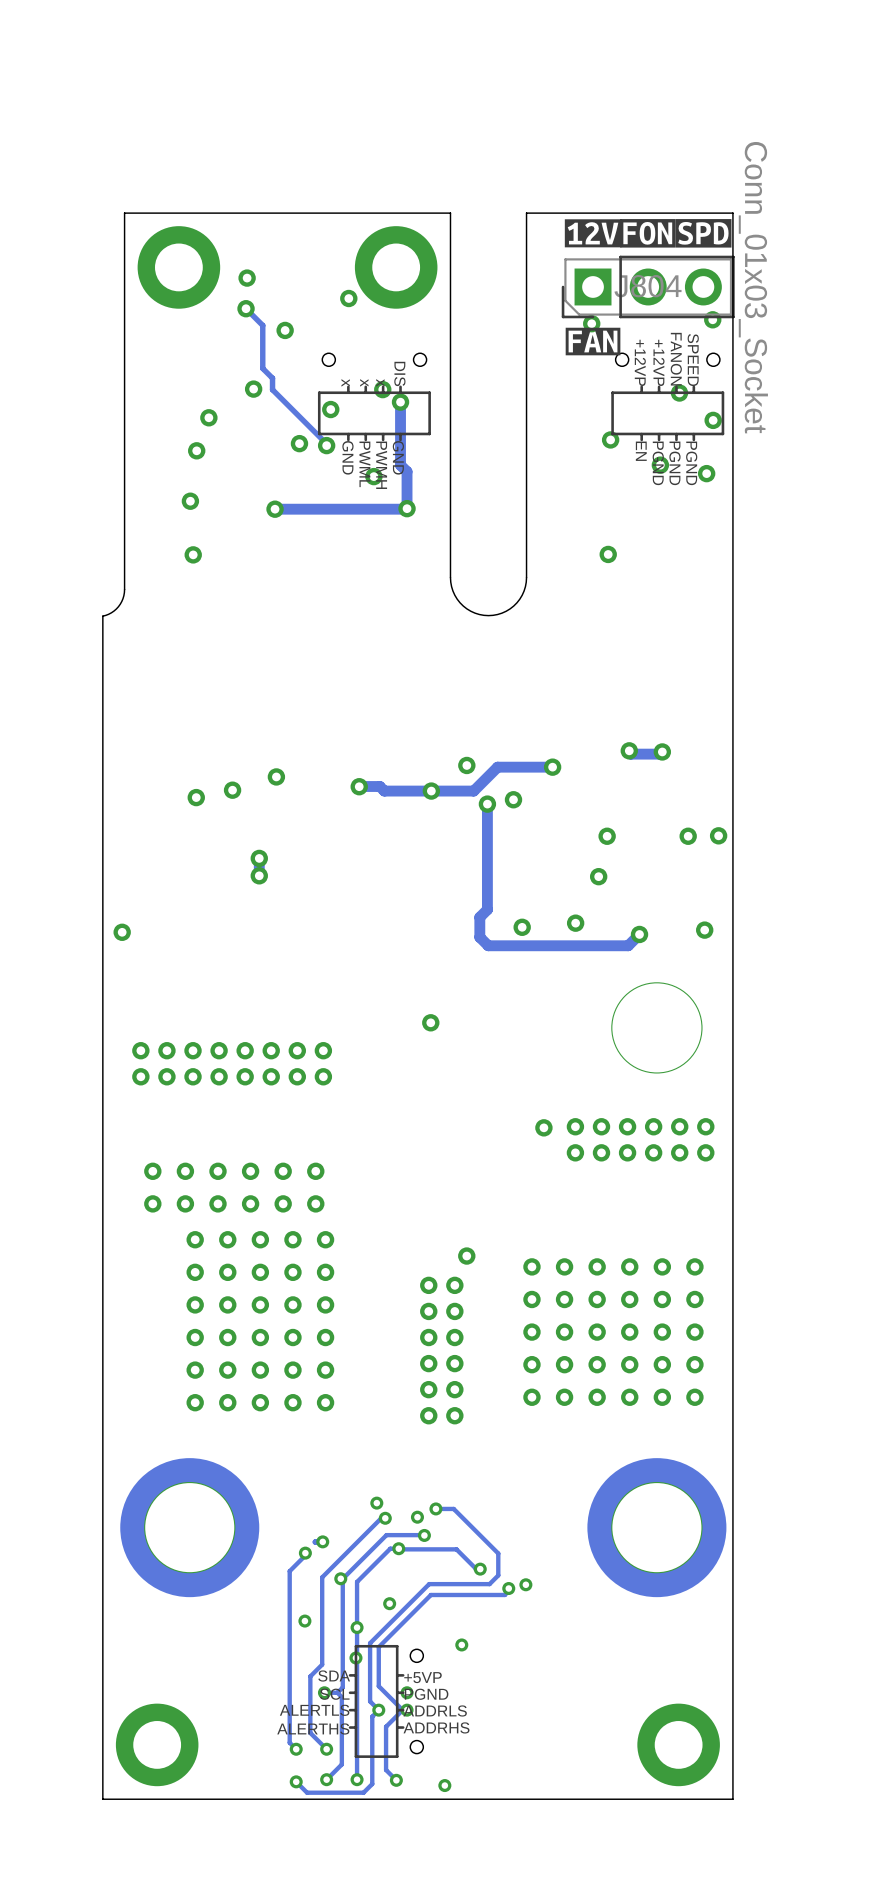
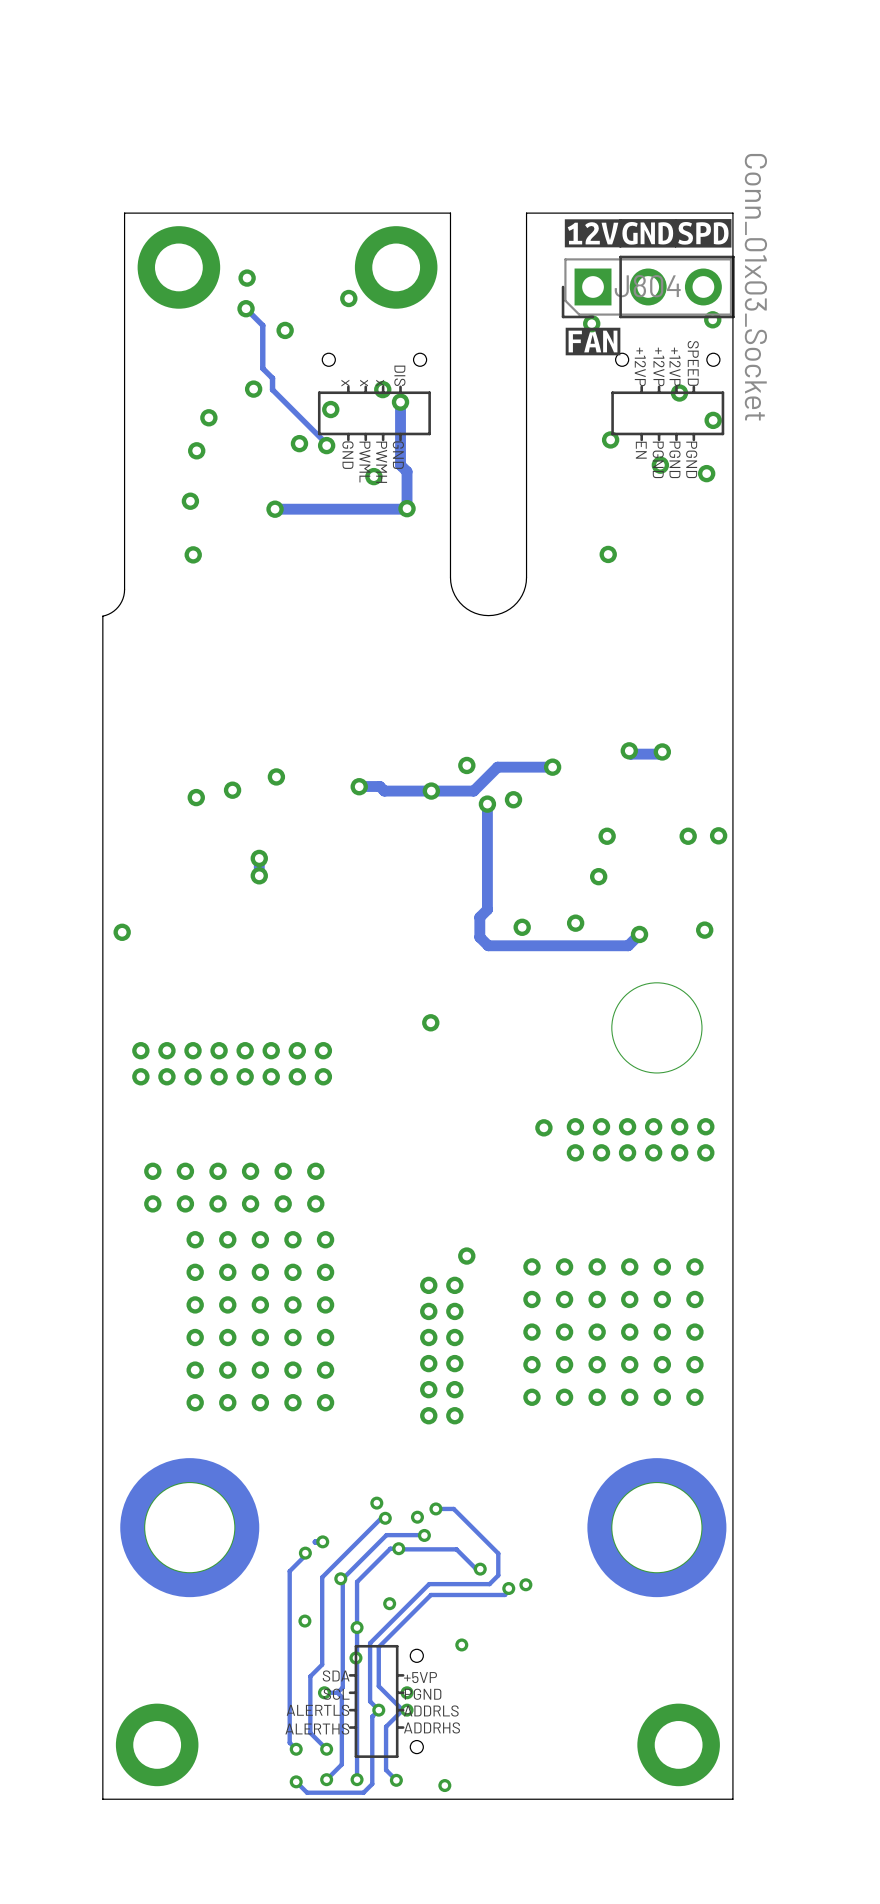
drawing shape: [620, 219, 676, 248] -> [619, 219, 677, 248]
text: FANON (676, 359) -> +12VP (675, 366)

